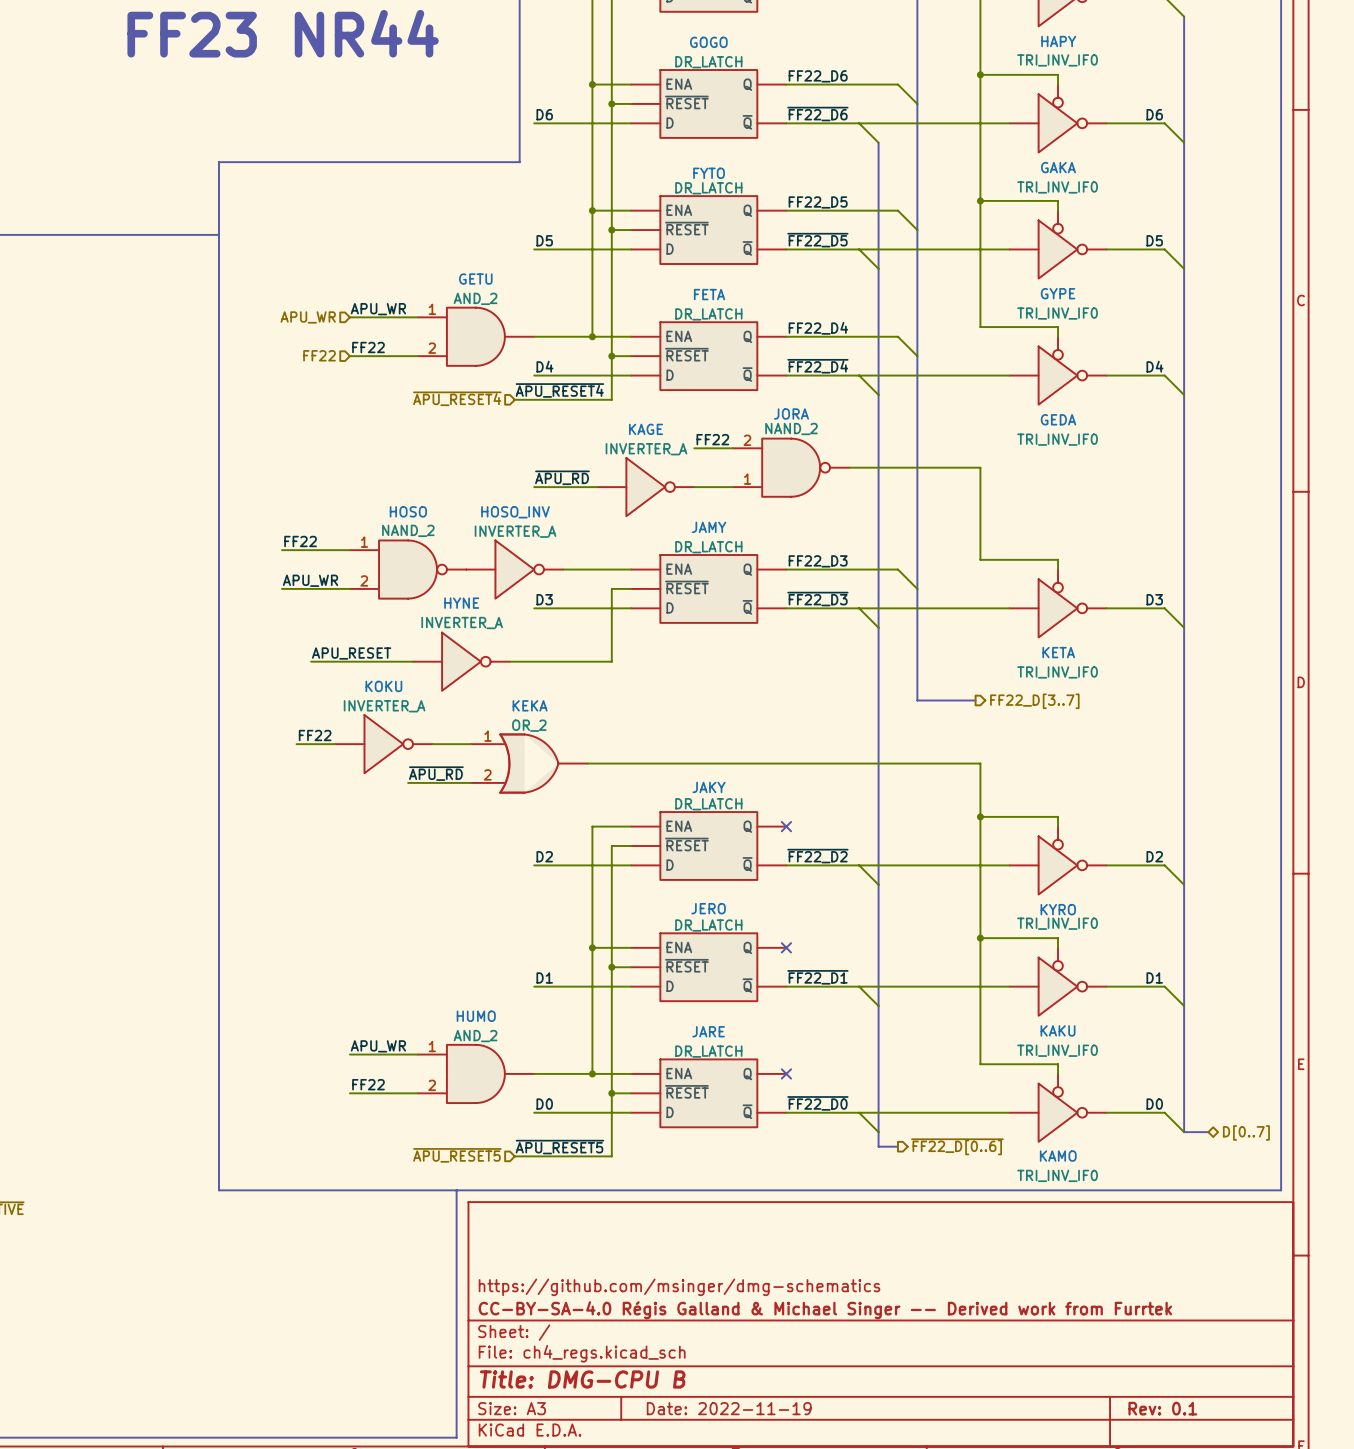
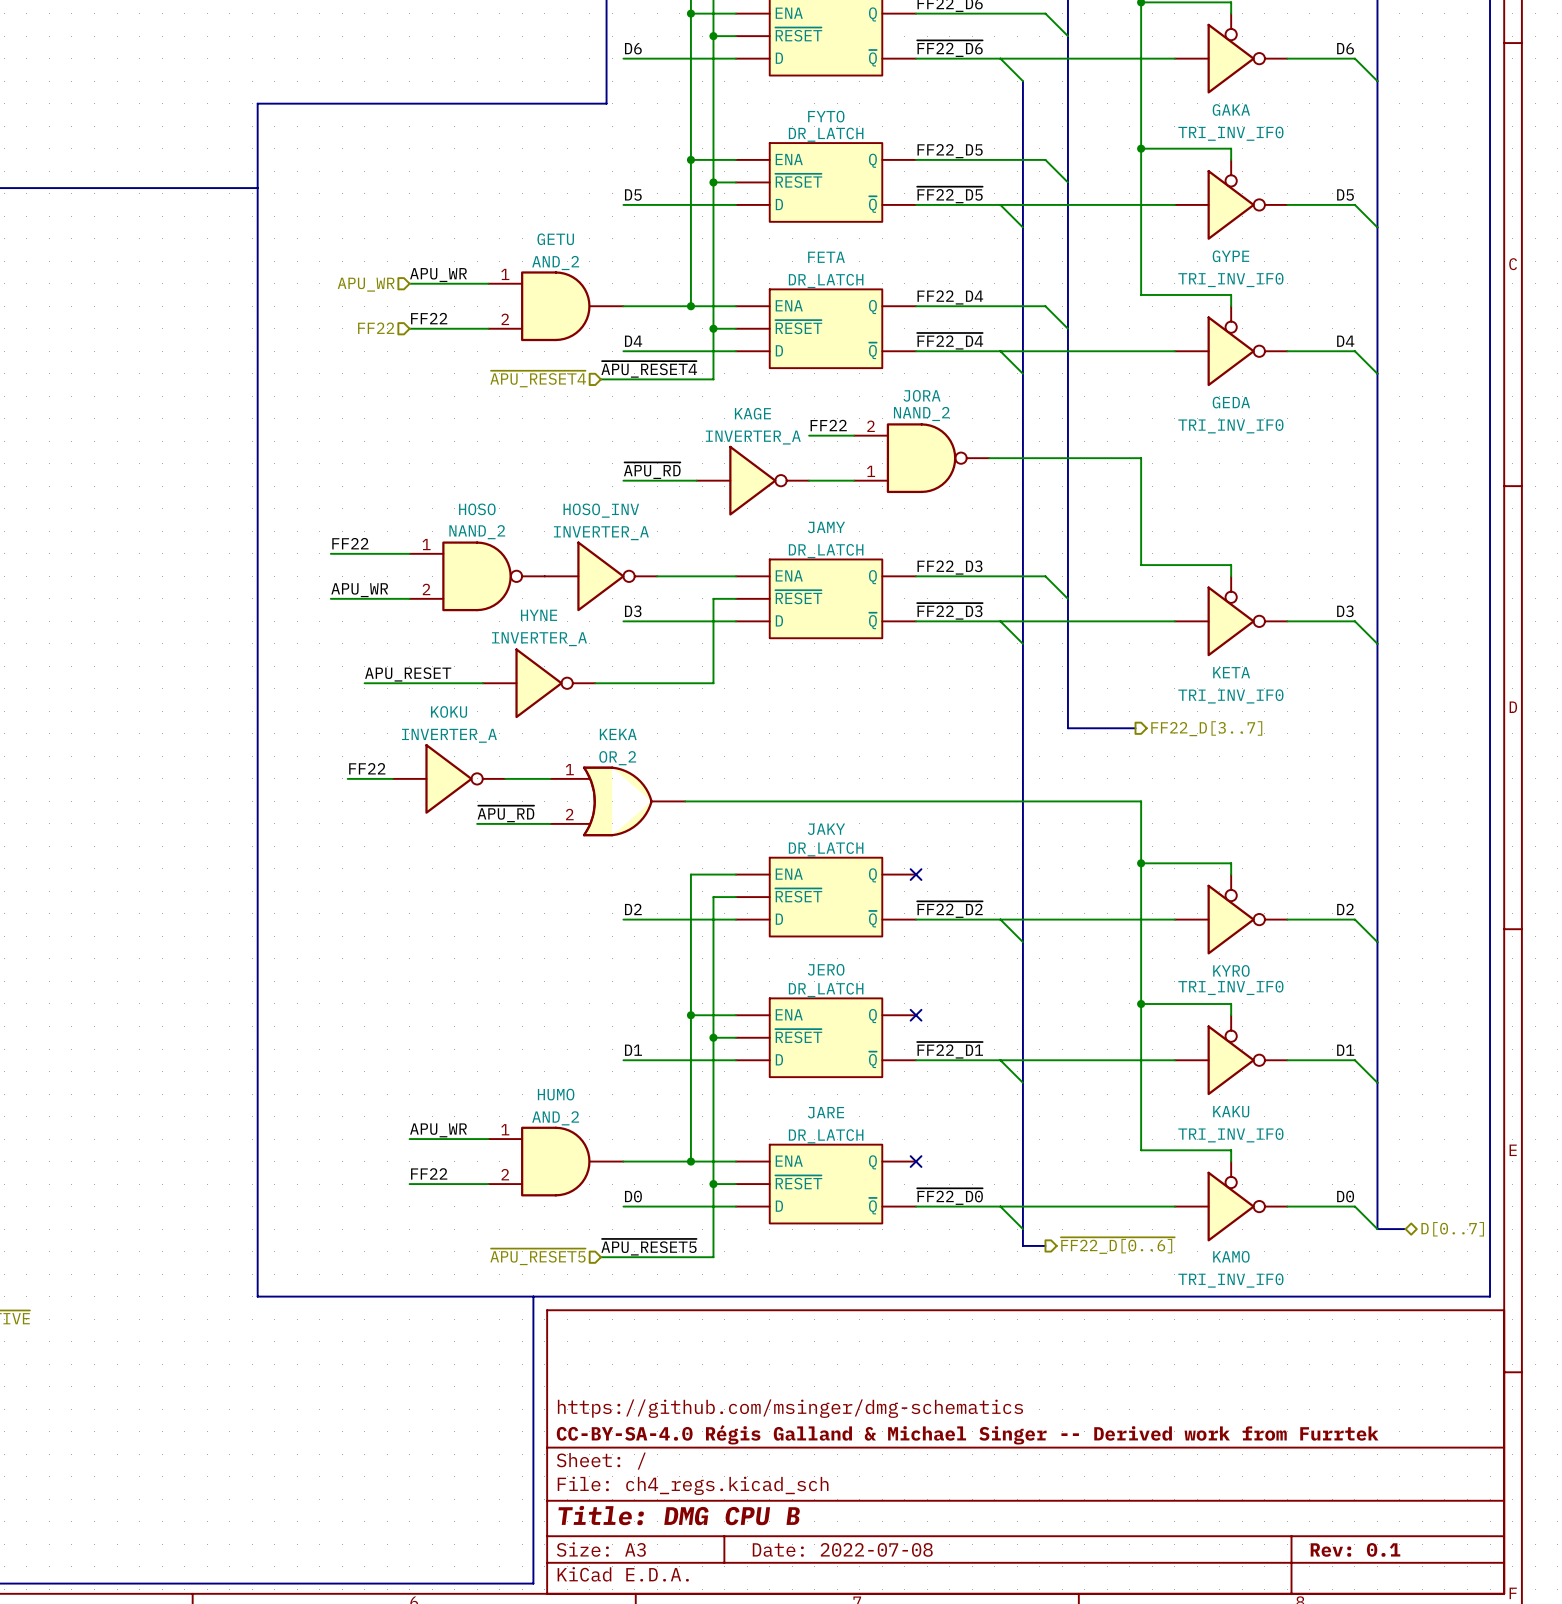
title block: Title: DMG-CPU B (582, 1379) -> Title: DMG CPU B (679, 1515)
title block: Date: 2022-11-19 (729, 1408) -> Date: 2022-07-08 (842, 1549)

